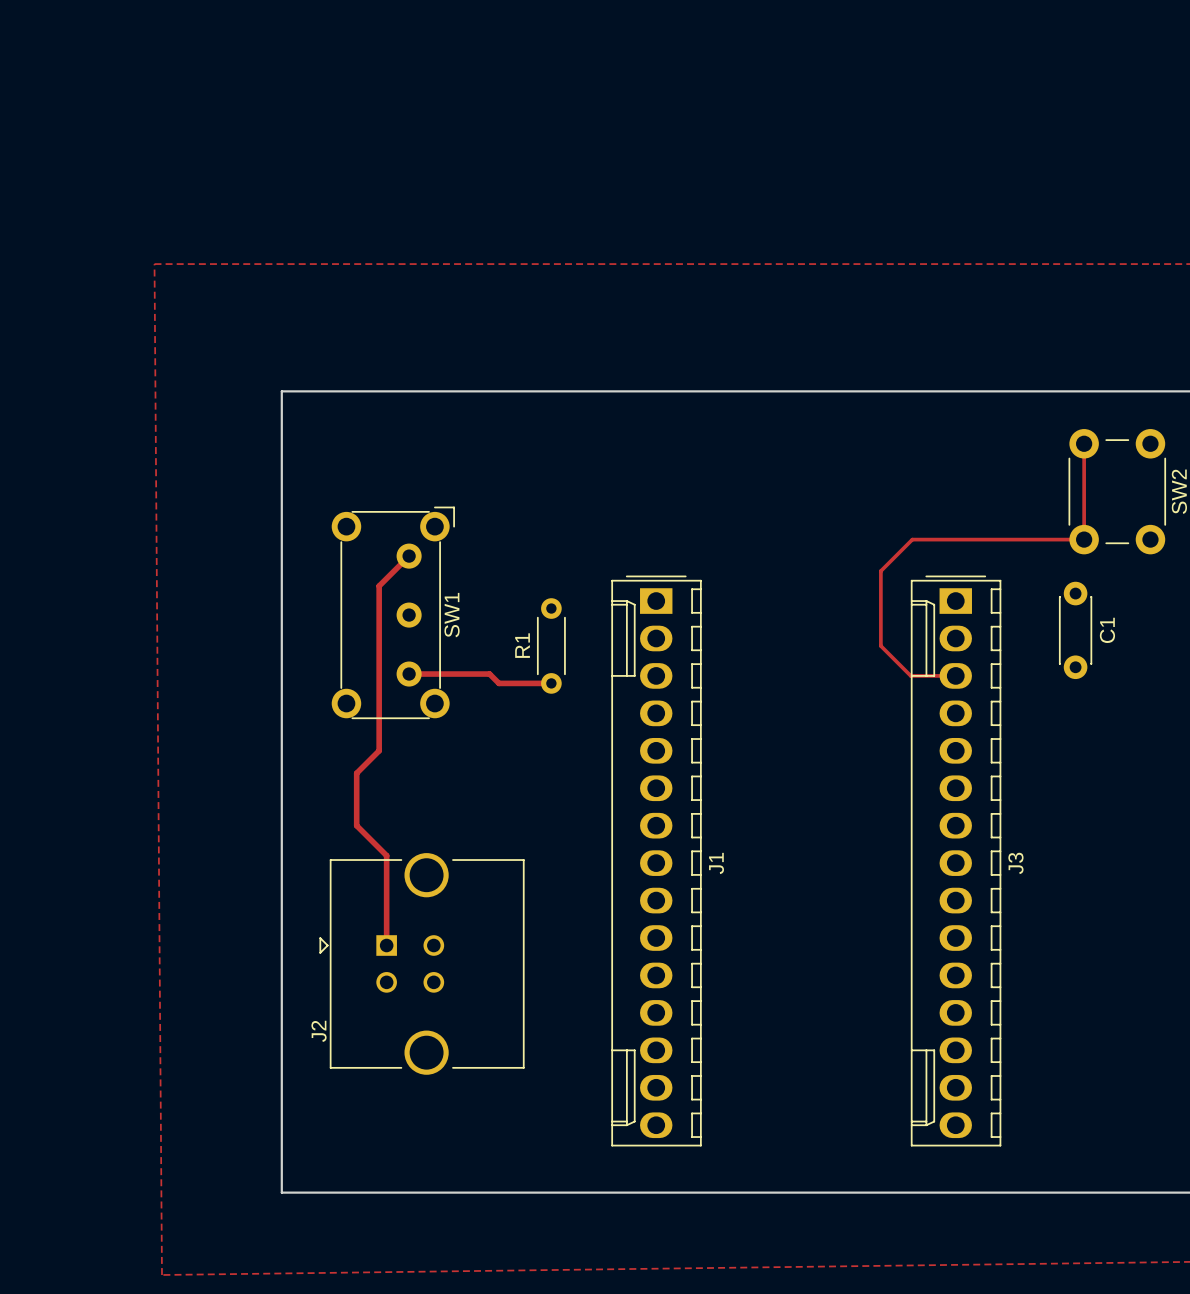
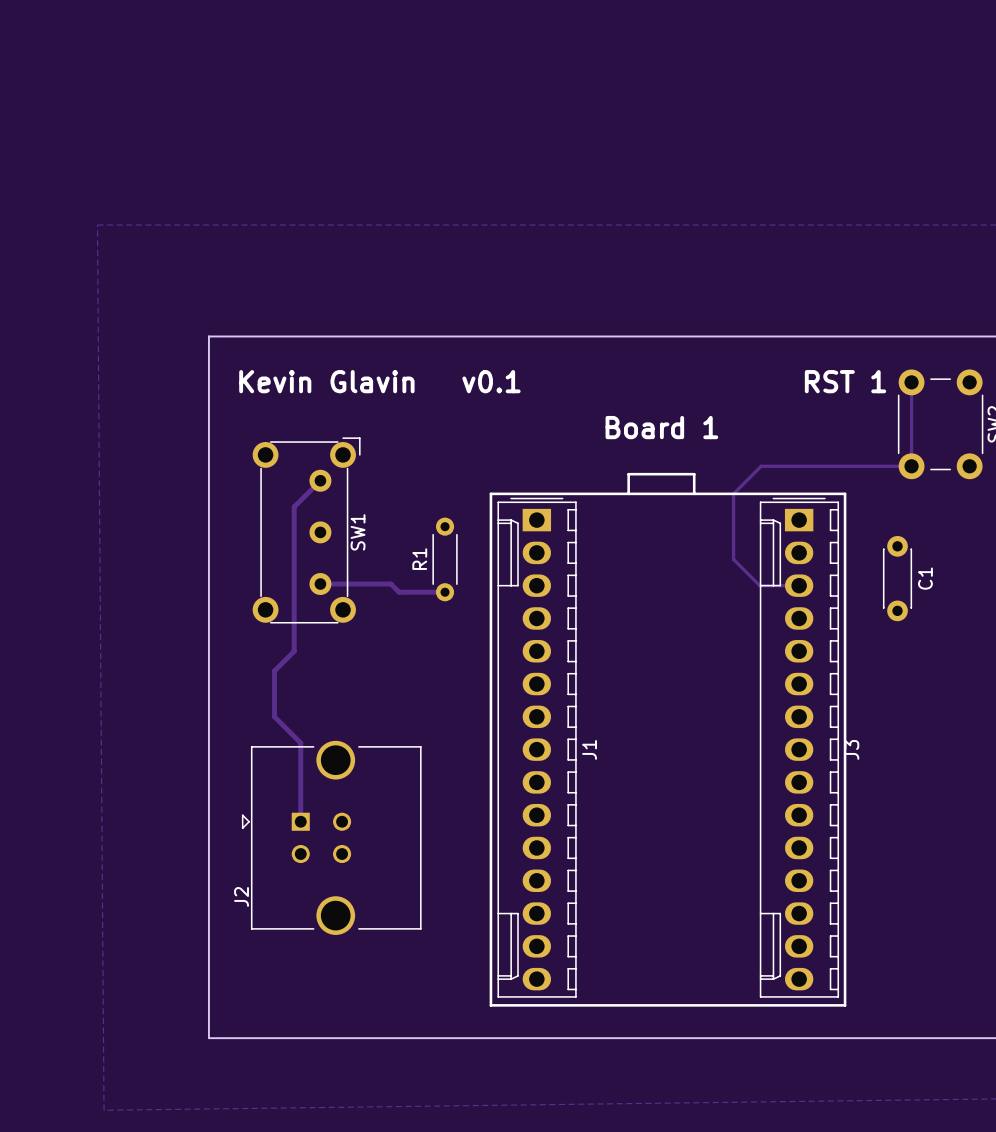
text: none -> Kevin Glavin v0.1 (379, 381)
text: none -> RST 1 (845, 381)
text: none -> Board 1 (661, 427)
line: none -> (490, 493) (845, 493) (845, 1005) (490, 1005) (490, 493)
line: none -> (628, 493) (628, 474) (694, 474) (694, 493)
C1 position: (1075, 630) -> (897, 578)

